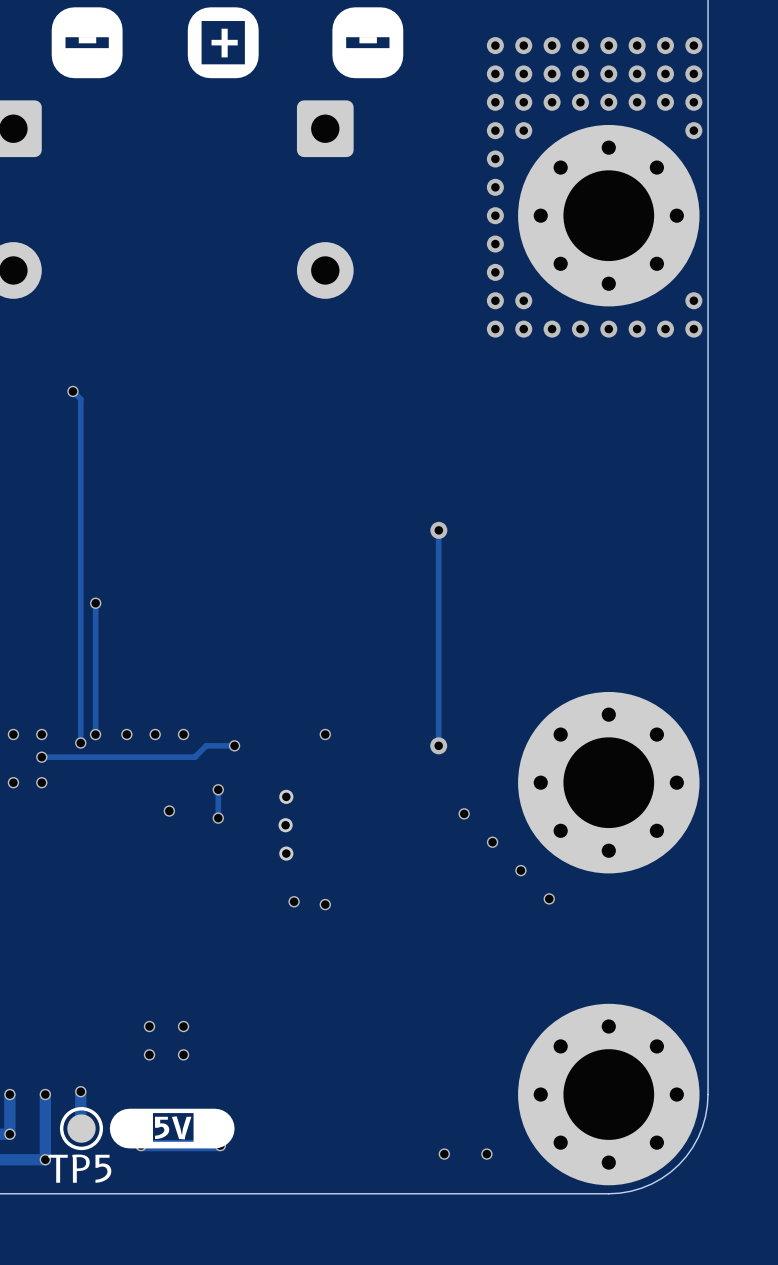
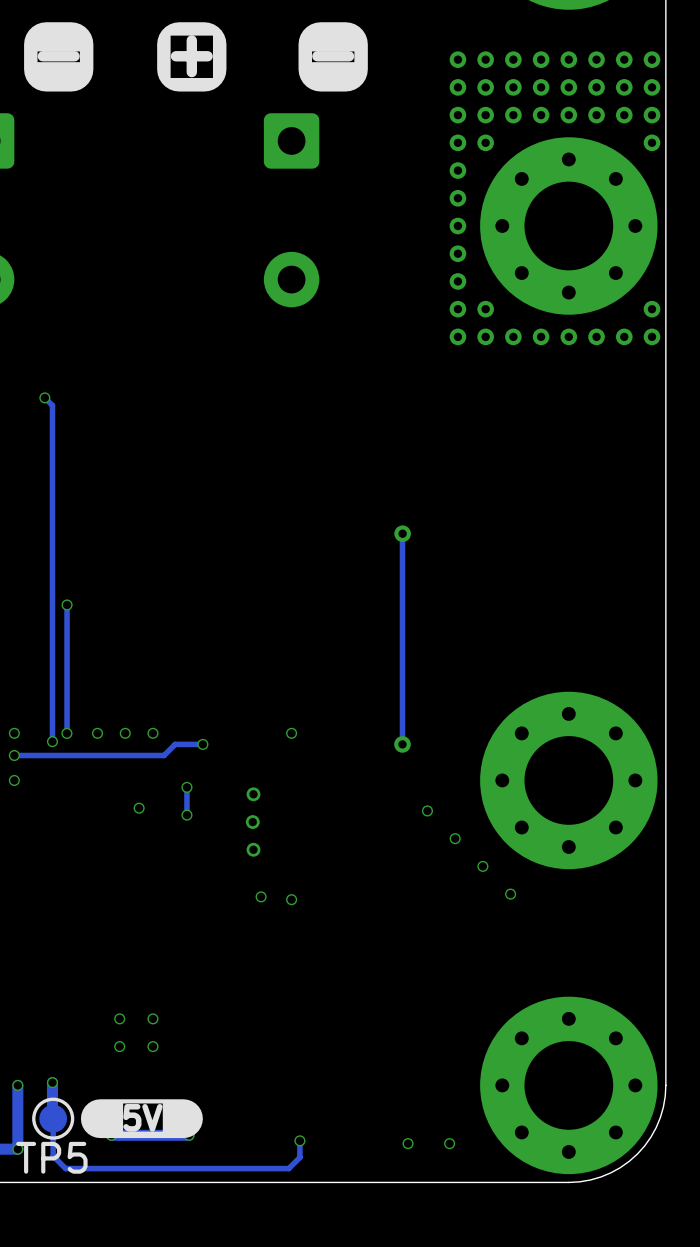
track: none -> (53, 1118) (53, 1156) (65, 1168) (288, 1168) (299, 1157) (299, 1140)
via: none -> (299, 1140)

